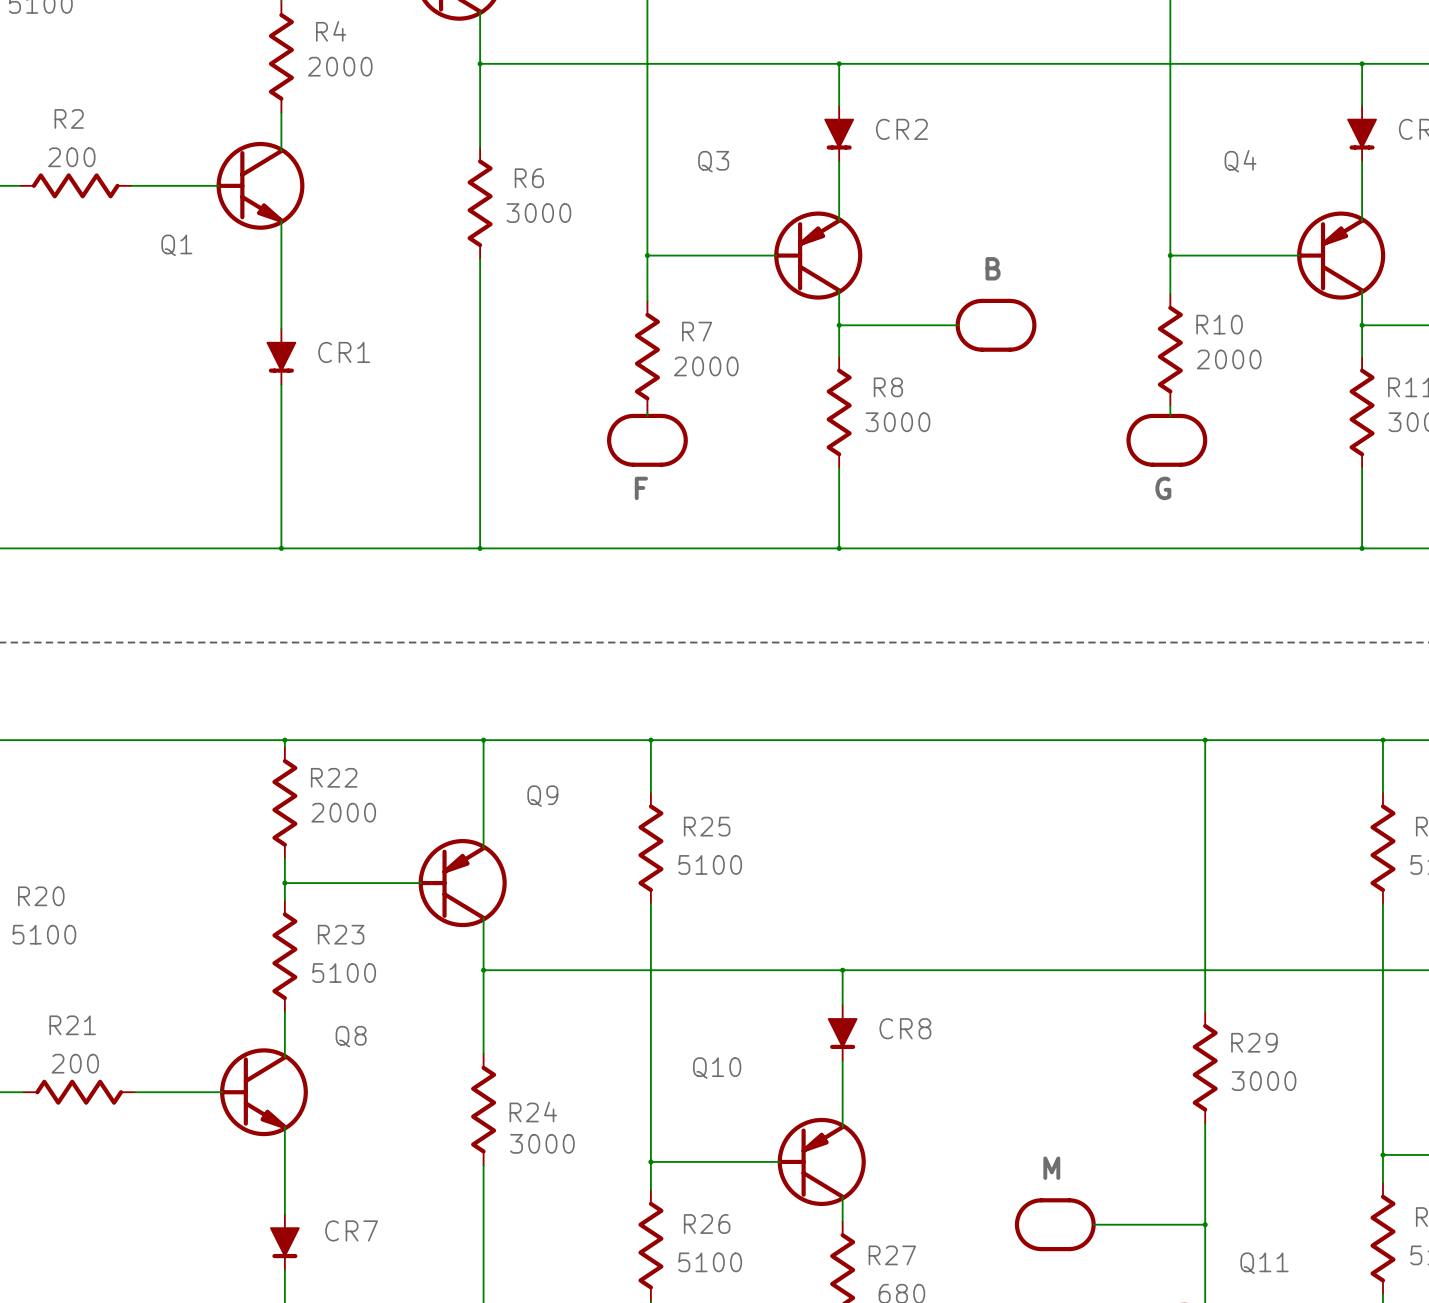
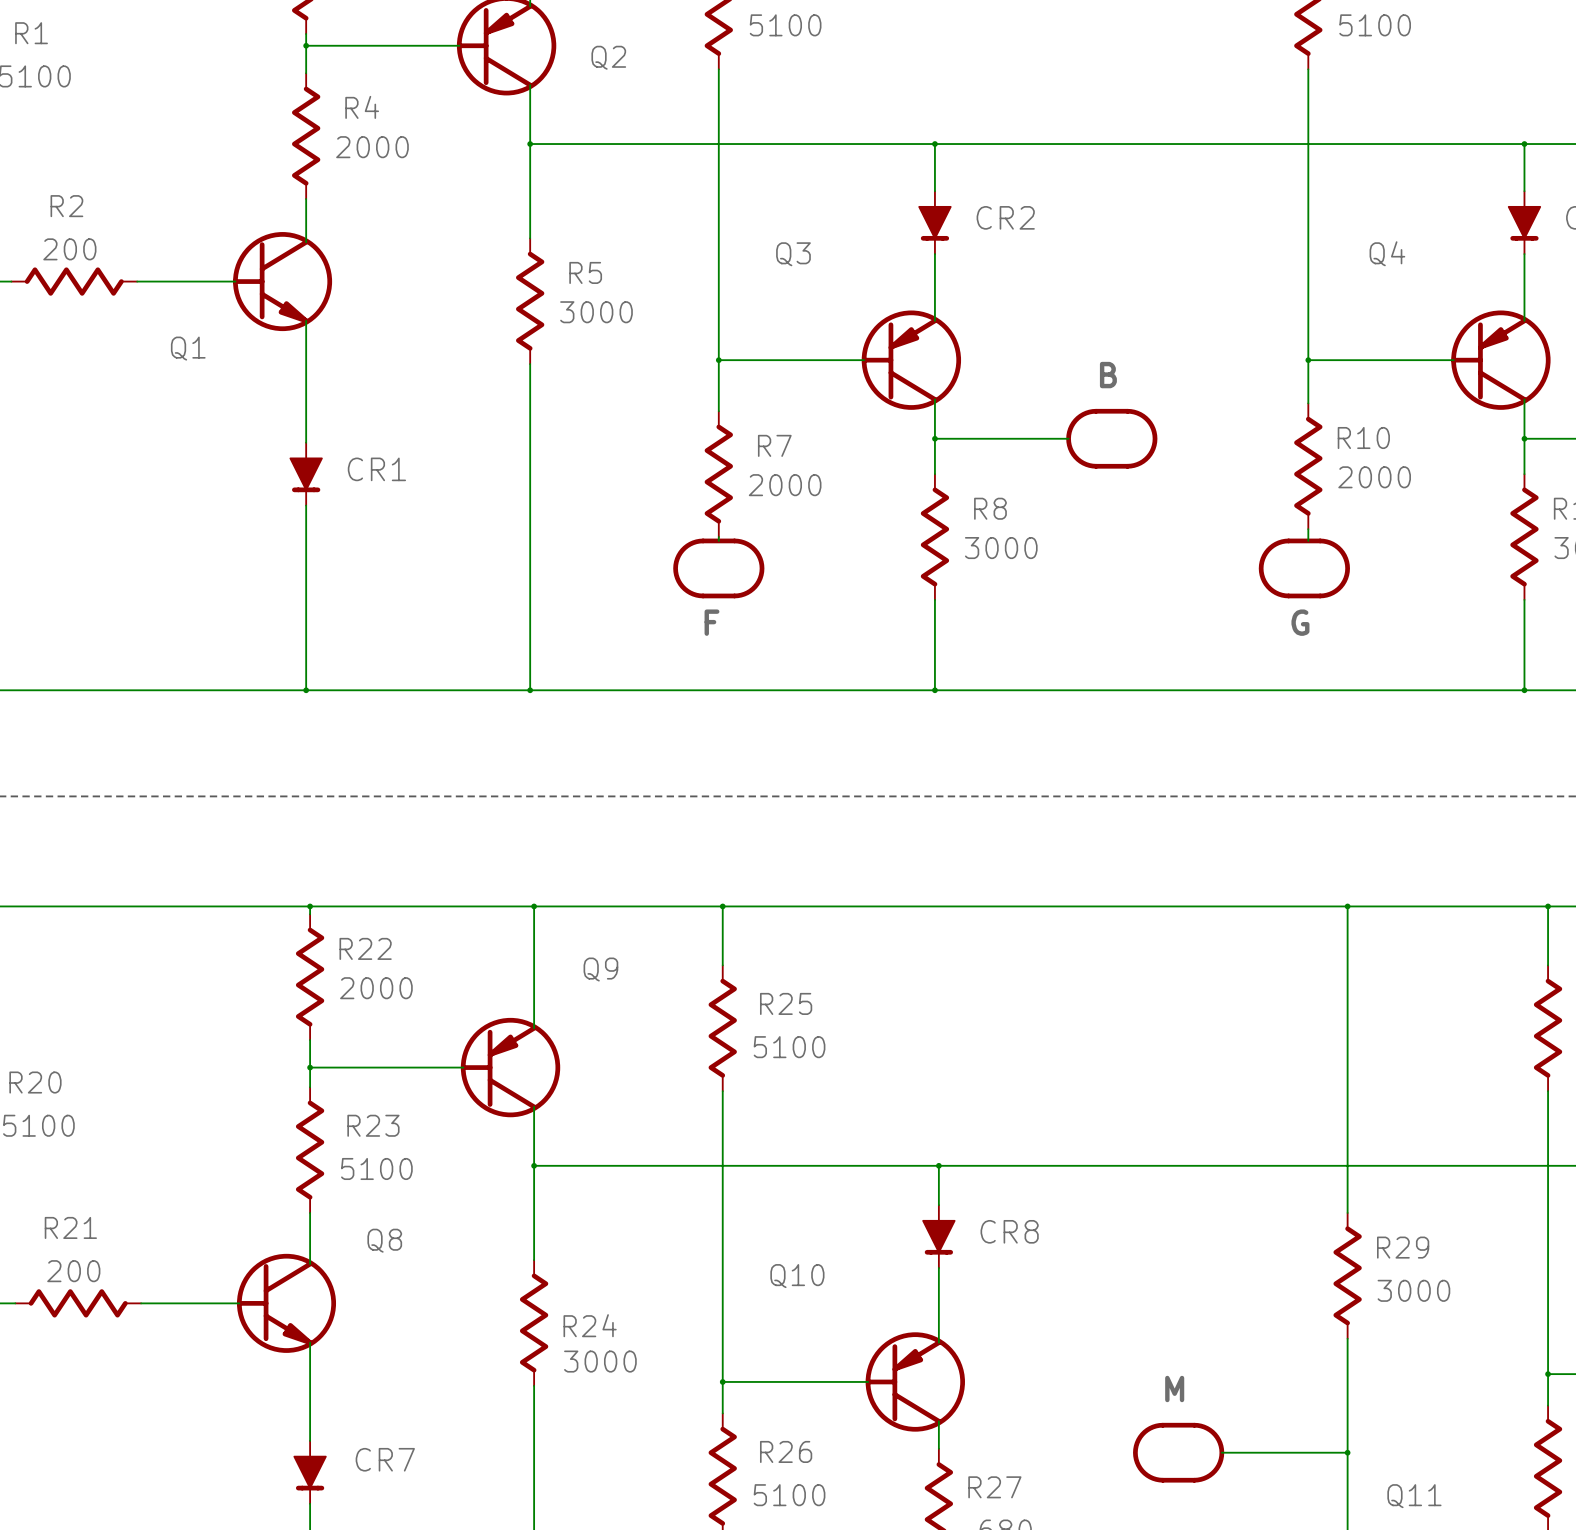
R6 name: R6 (529, 178) -> R5 (585, 272)

